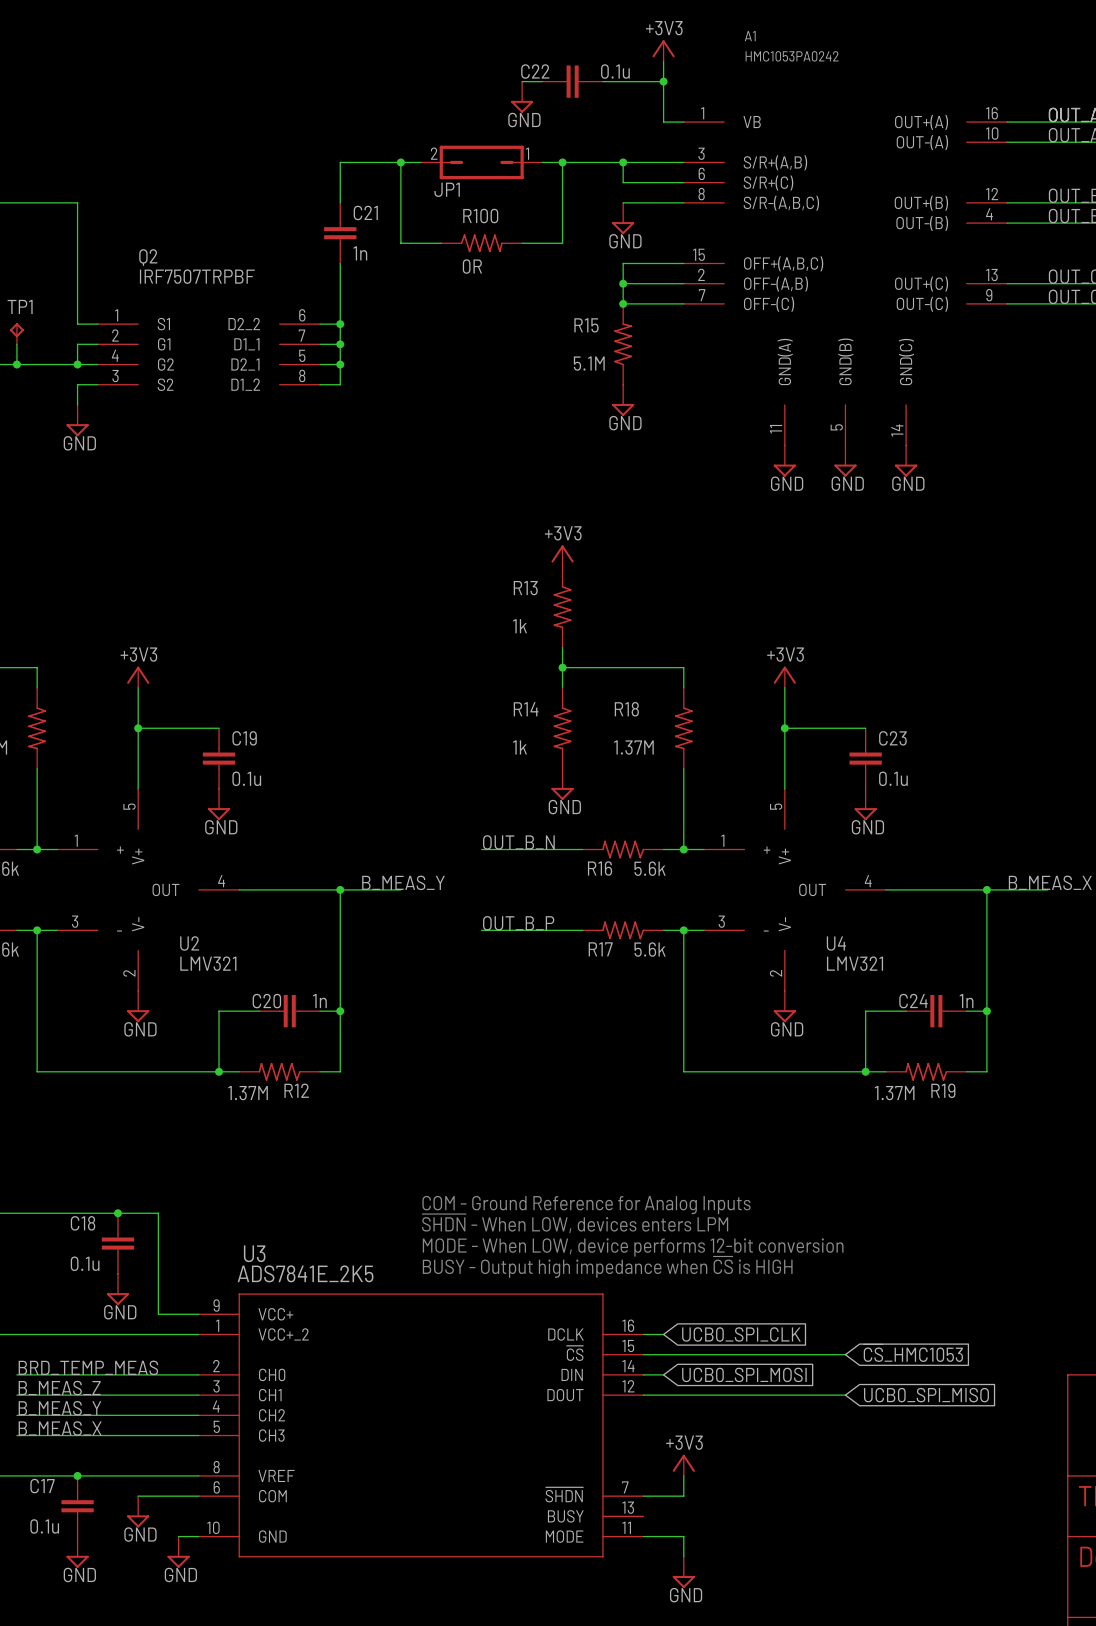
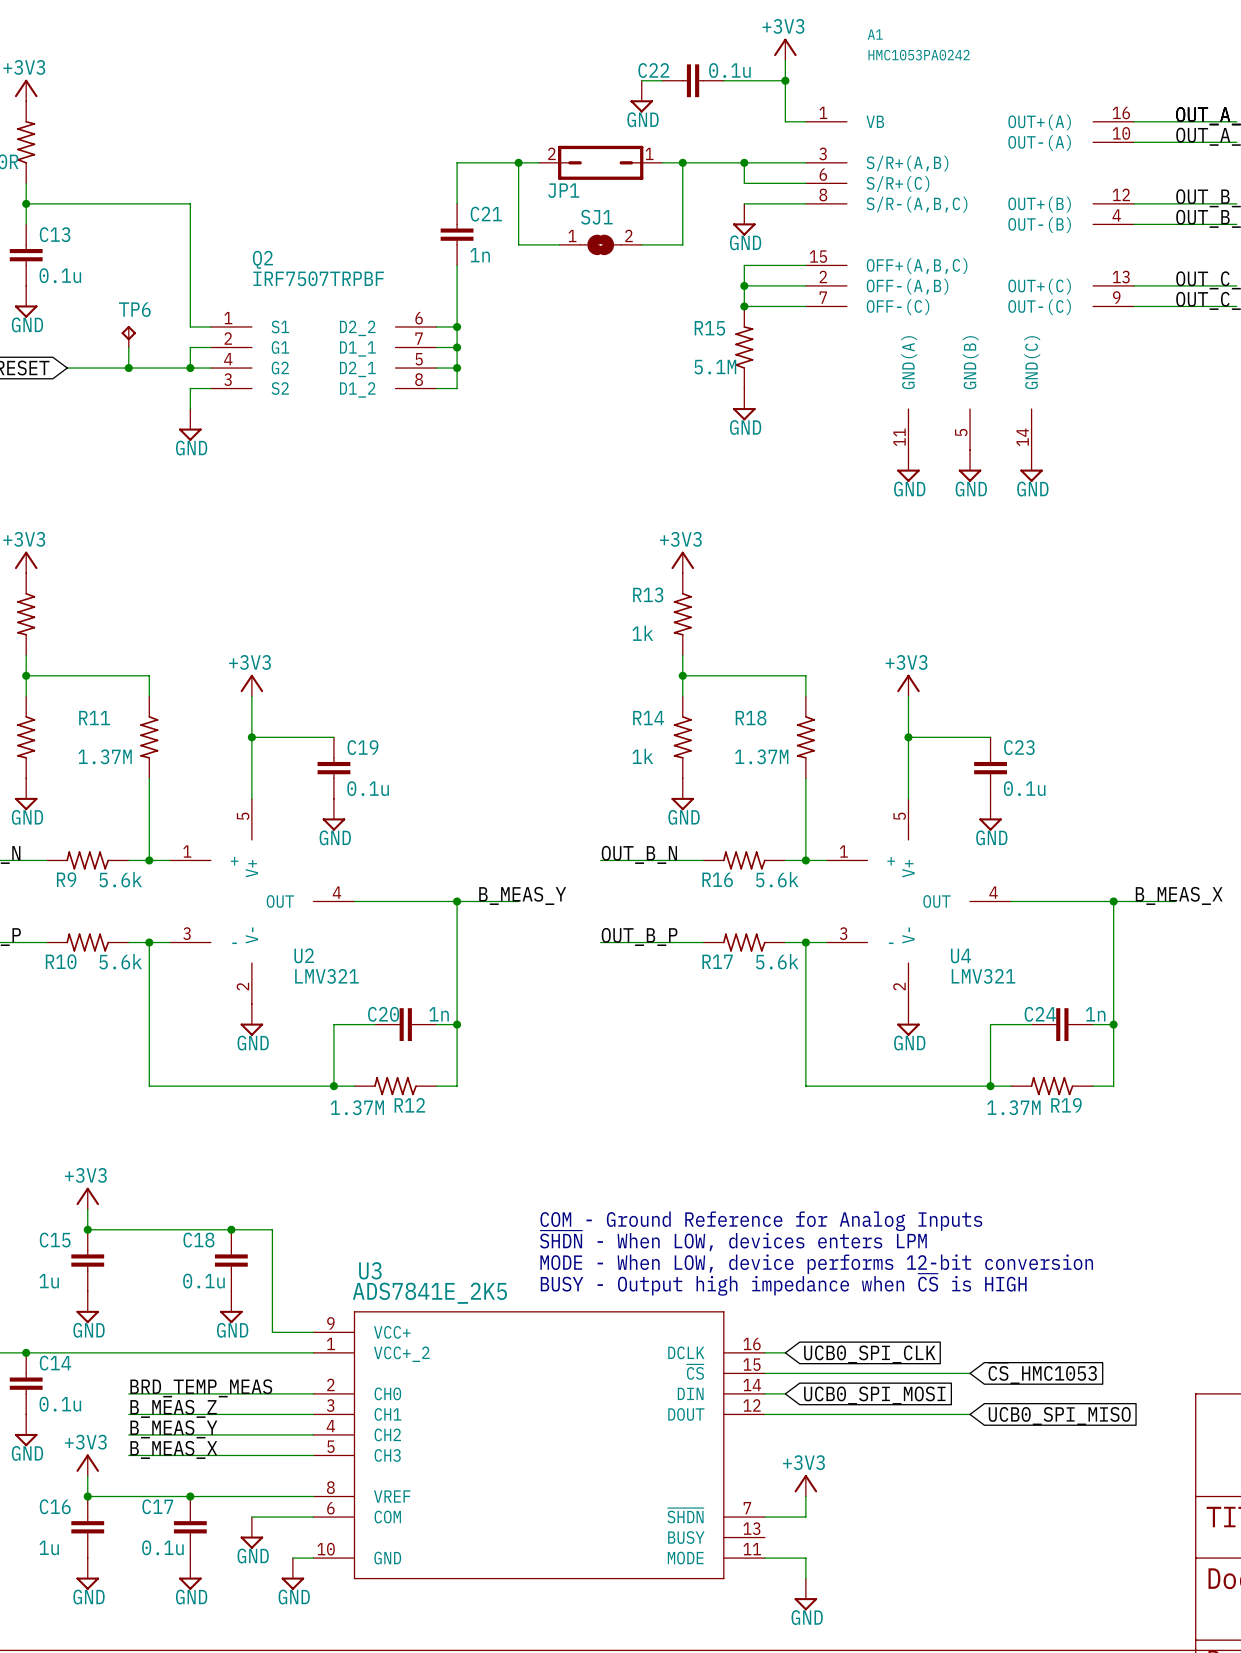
R100: 0R (481, 243) -> none
SJ1: none -> (600, 244)
TP1 name: TP1 (20, 306) -> TP6 (134, 309)

